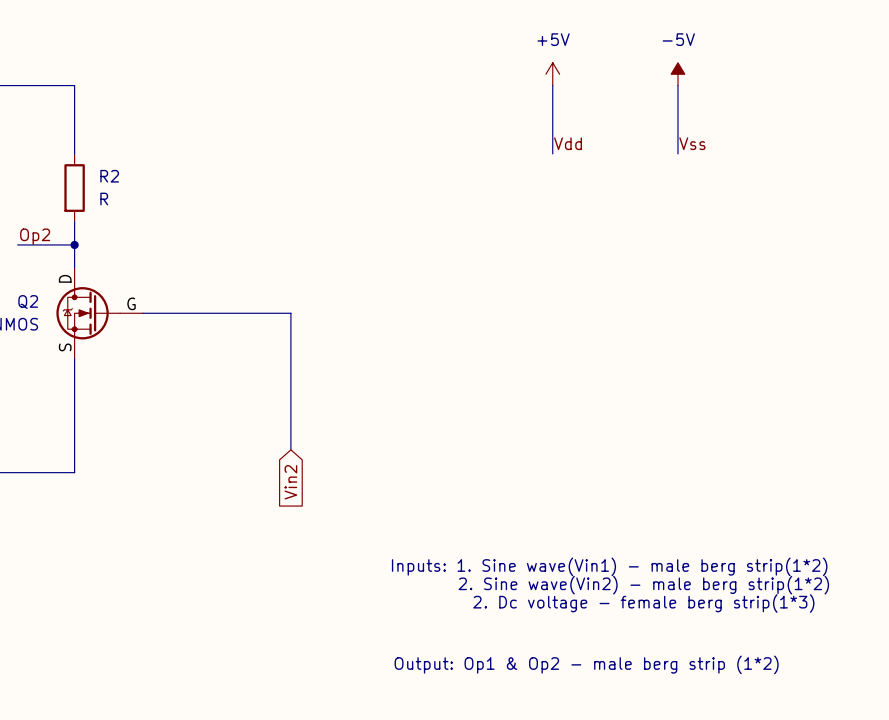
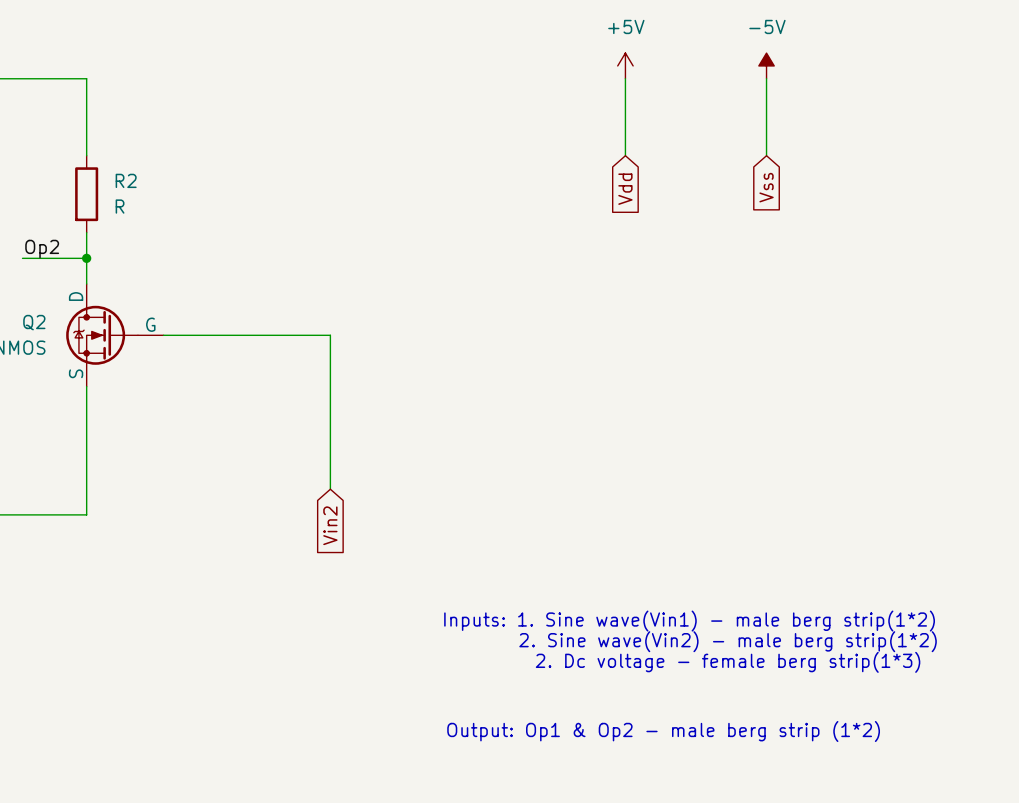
label: Vdd (568, 143) -> none
label: Vss (692, 143) -> none
global label: none -> Vss (766, 187)
global label: none -> Vdd (625, 189)

